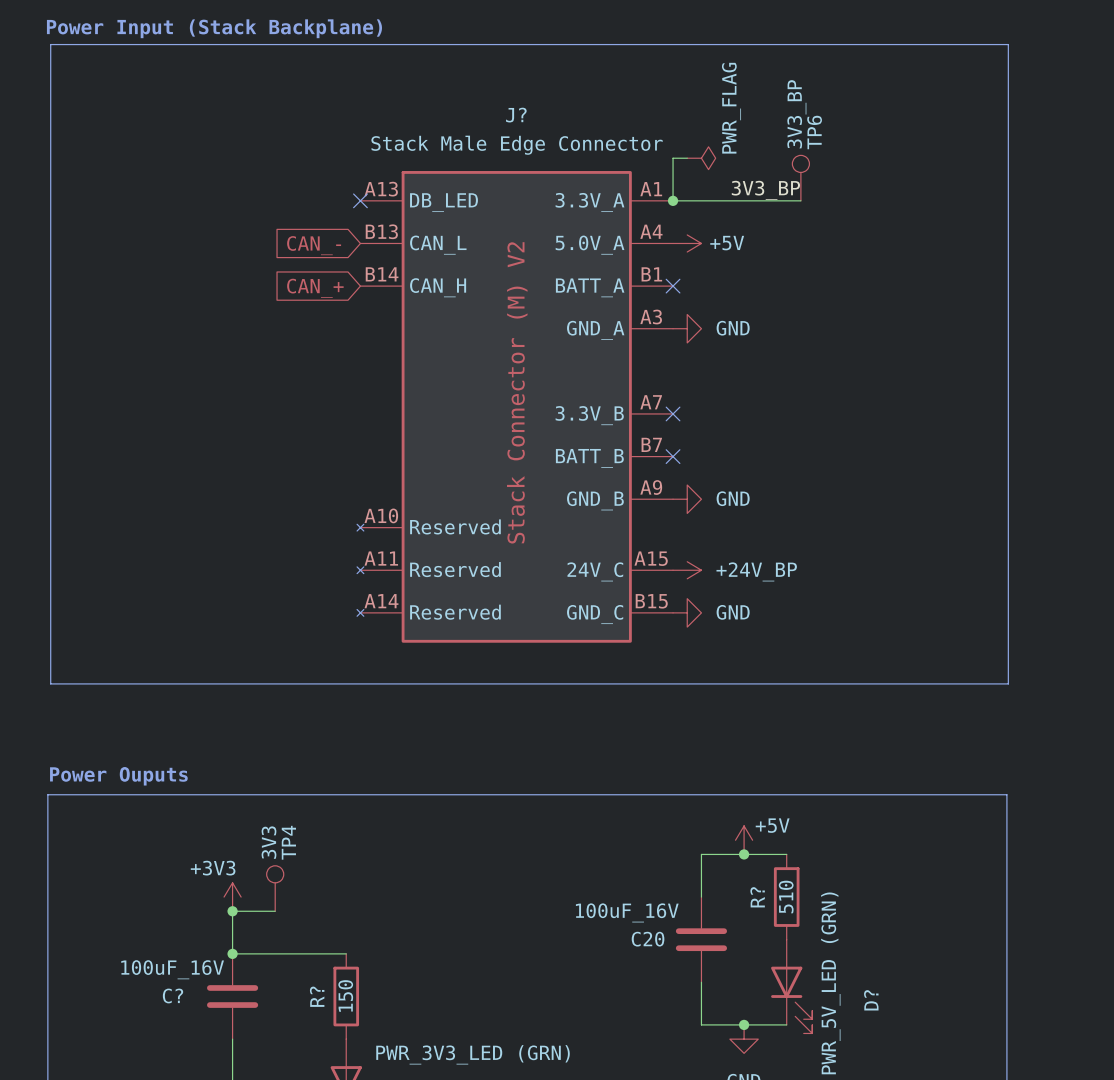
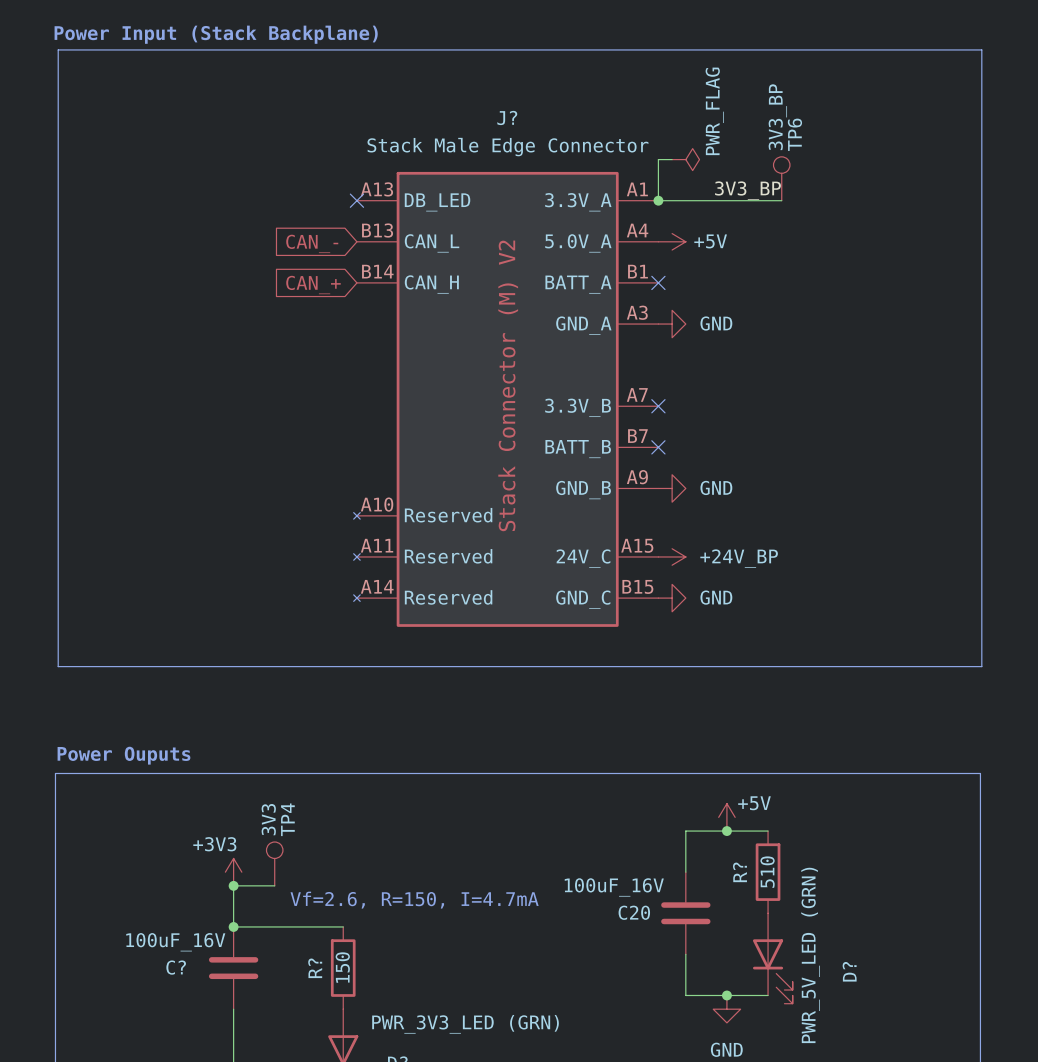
text: none -> Vf=2.6, R=150, I=4.7mA (414, 900)

